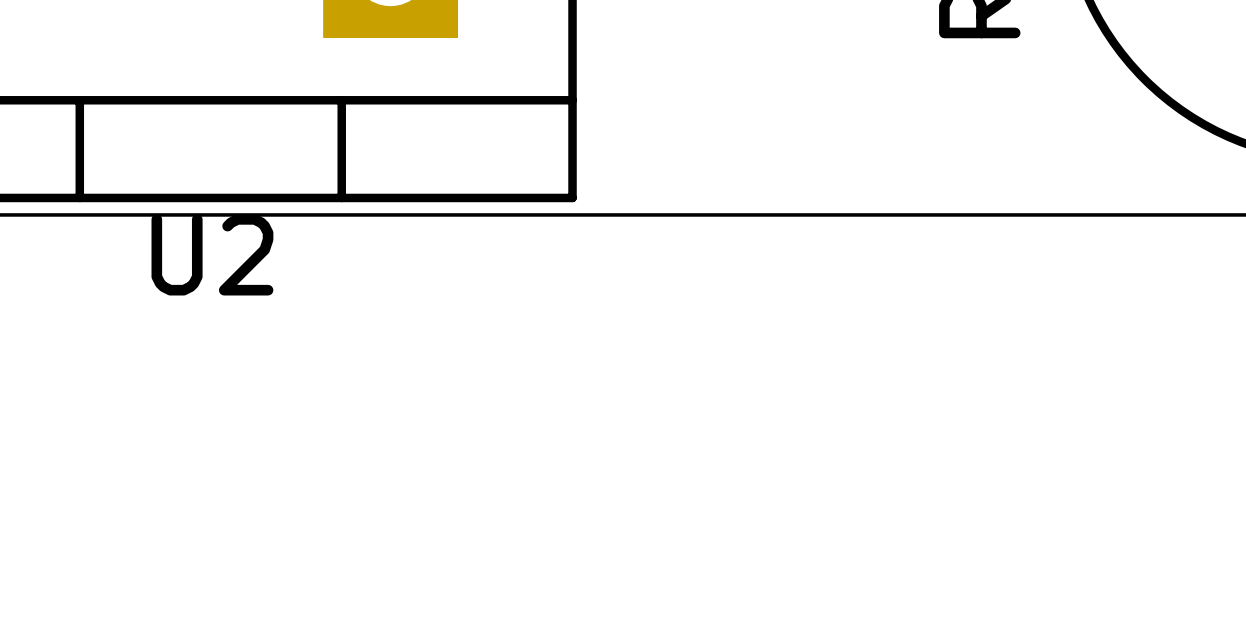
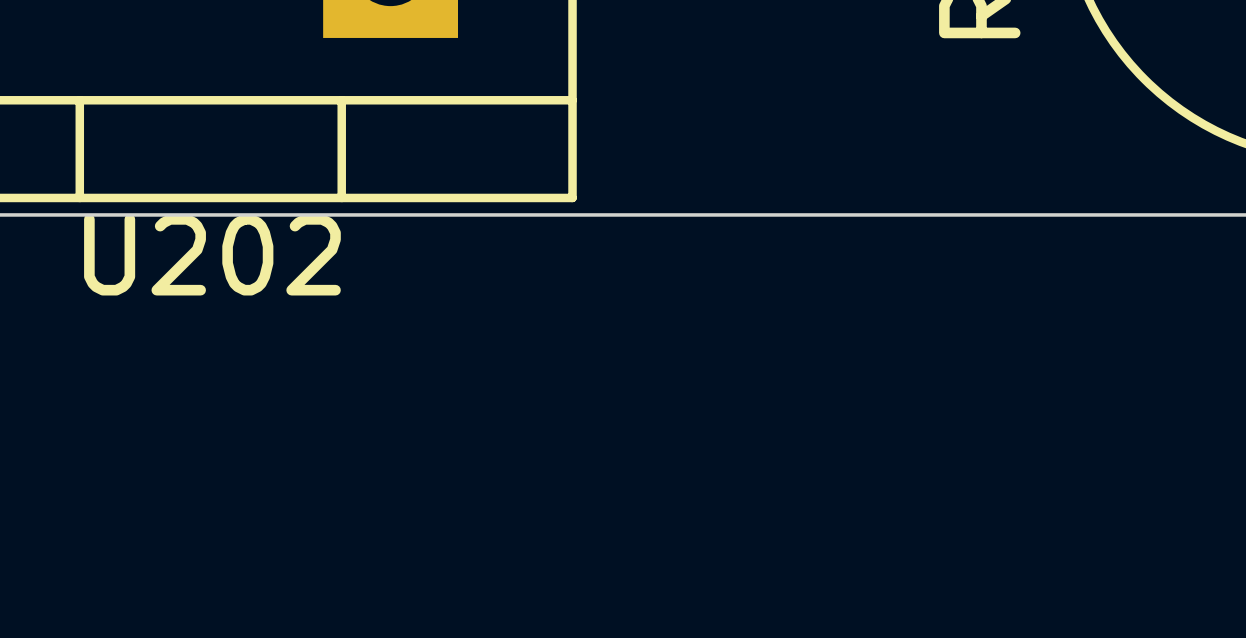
U2 name: U2 (212, 254) -> U202 (212, 254)

